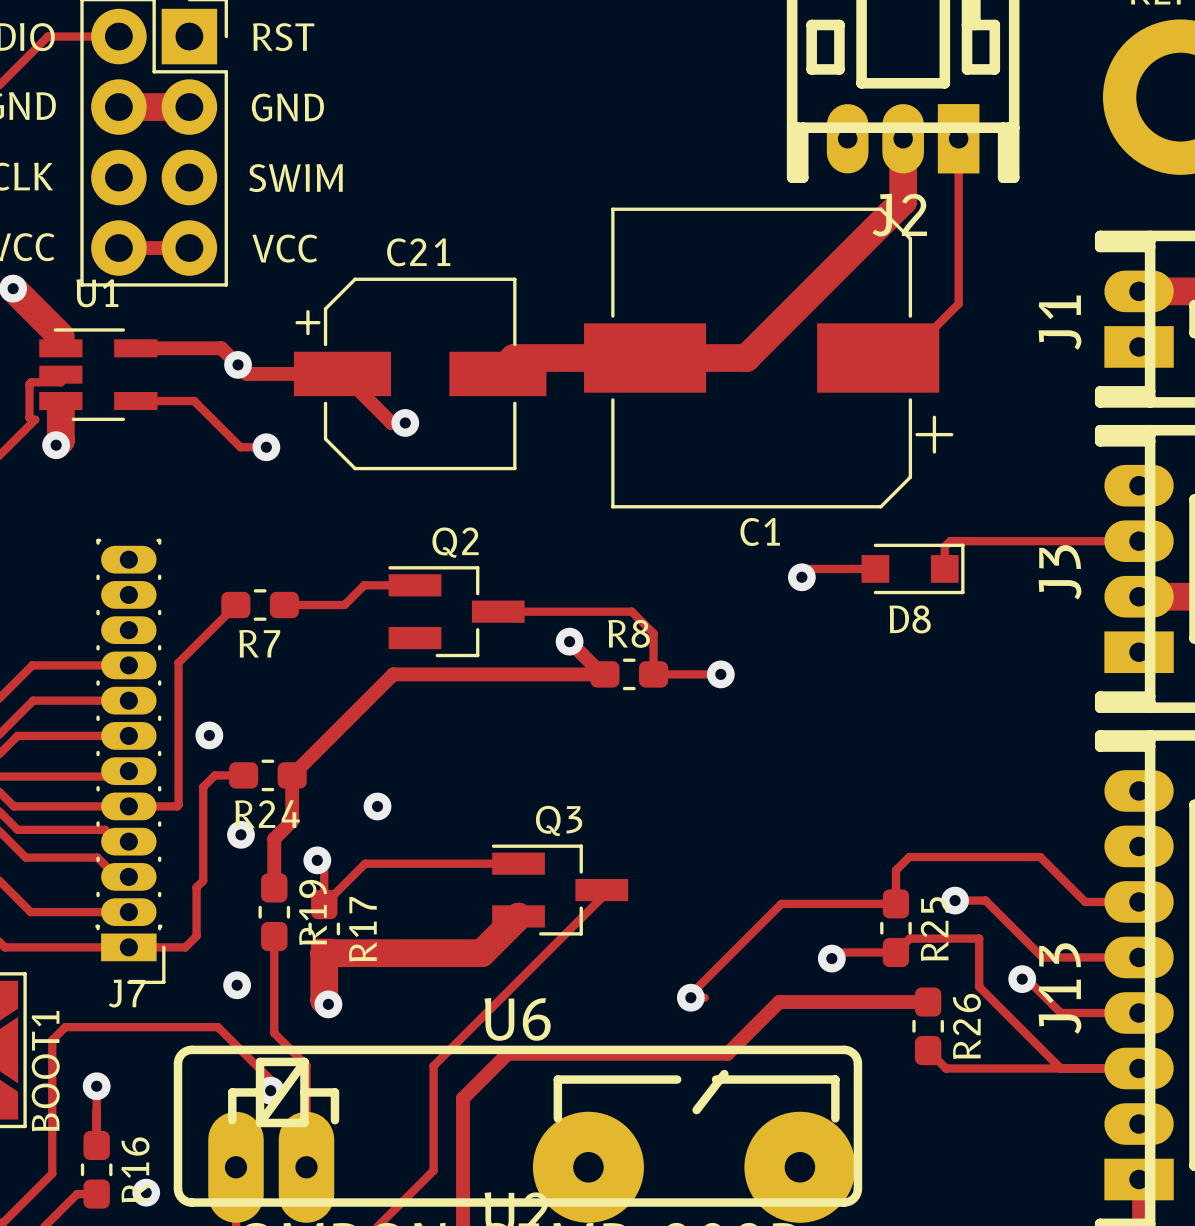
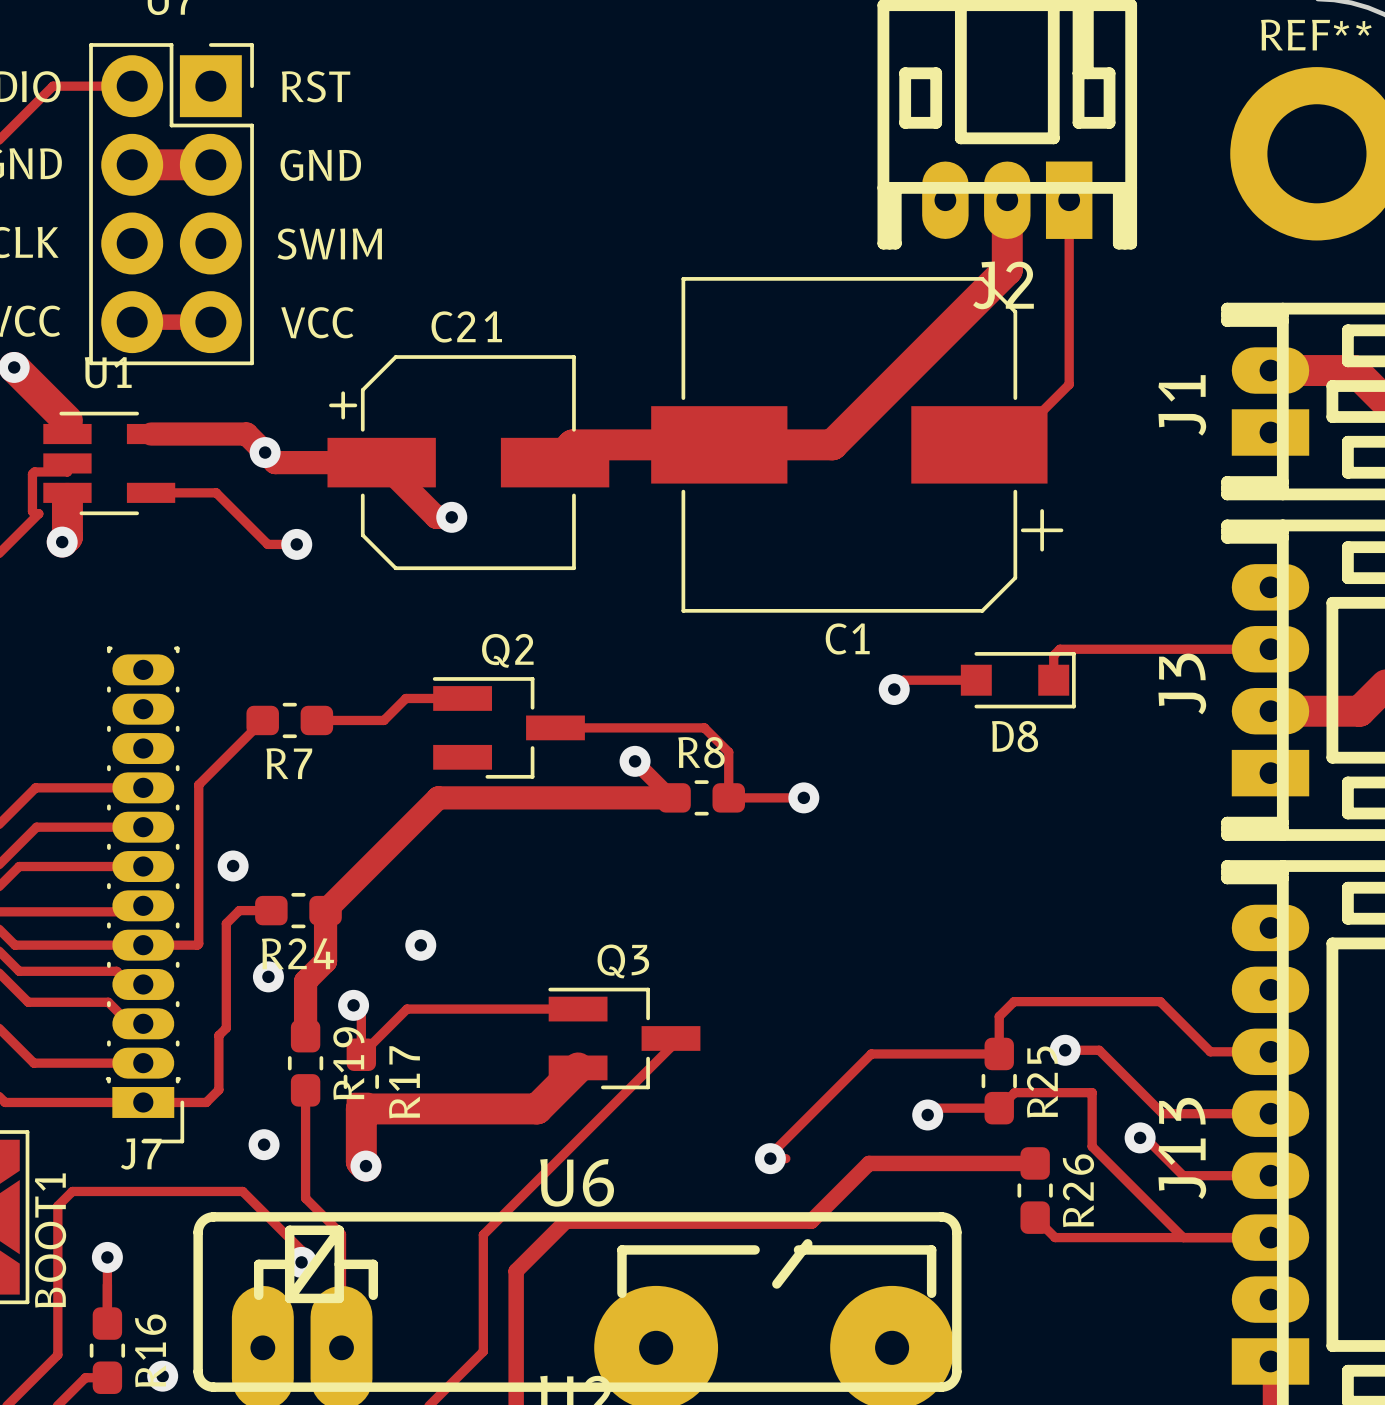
track width: thin (135, 348) (221, 348) (247, 373) (342, 373) (391, 422) (405, 422) -> thick (151, 434) (246, 434) (275, 462) (381, 462) (436, 517) (451, 517)
track width: thin (604, 674) (393, 674) (292, 775) (292, 820) (274, 838) (274, 887) -> thick (674, 797) (438, 797) (325, 910) (325, 961) (305, 981) (305, 1036)

